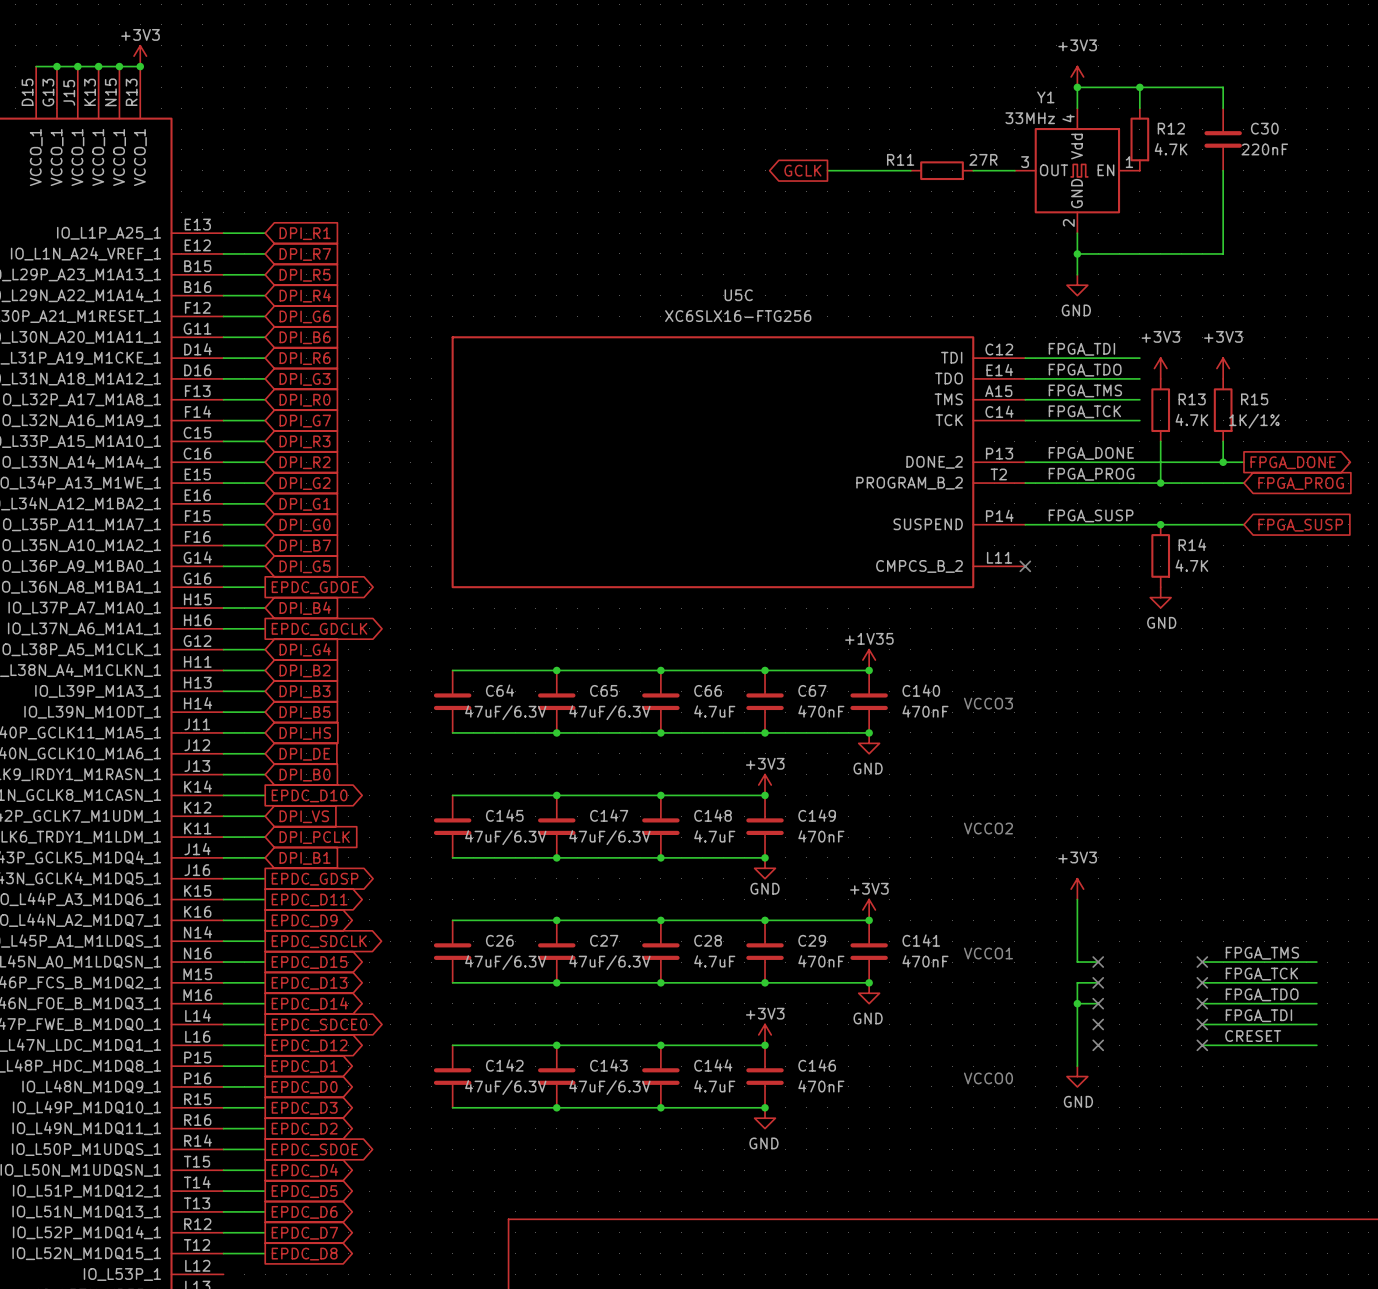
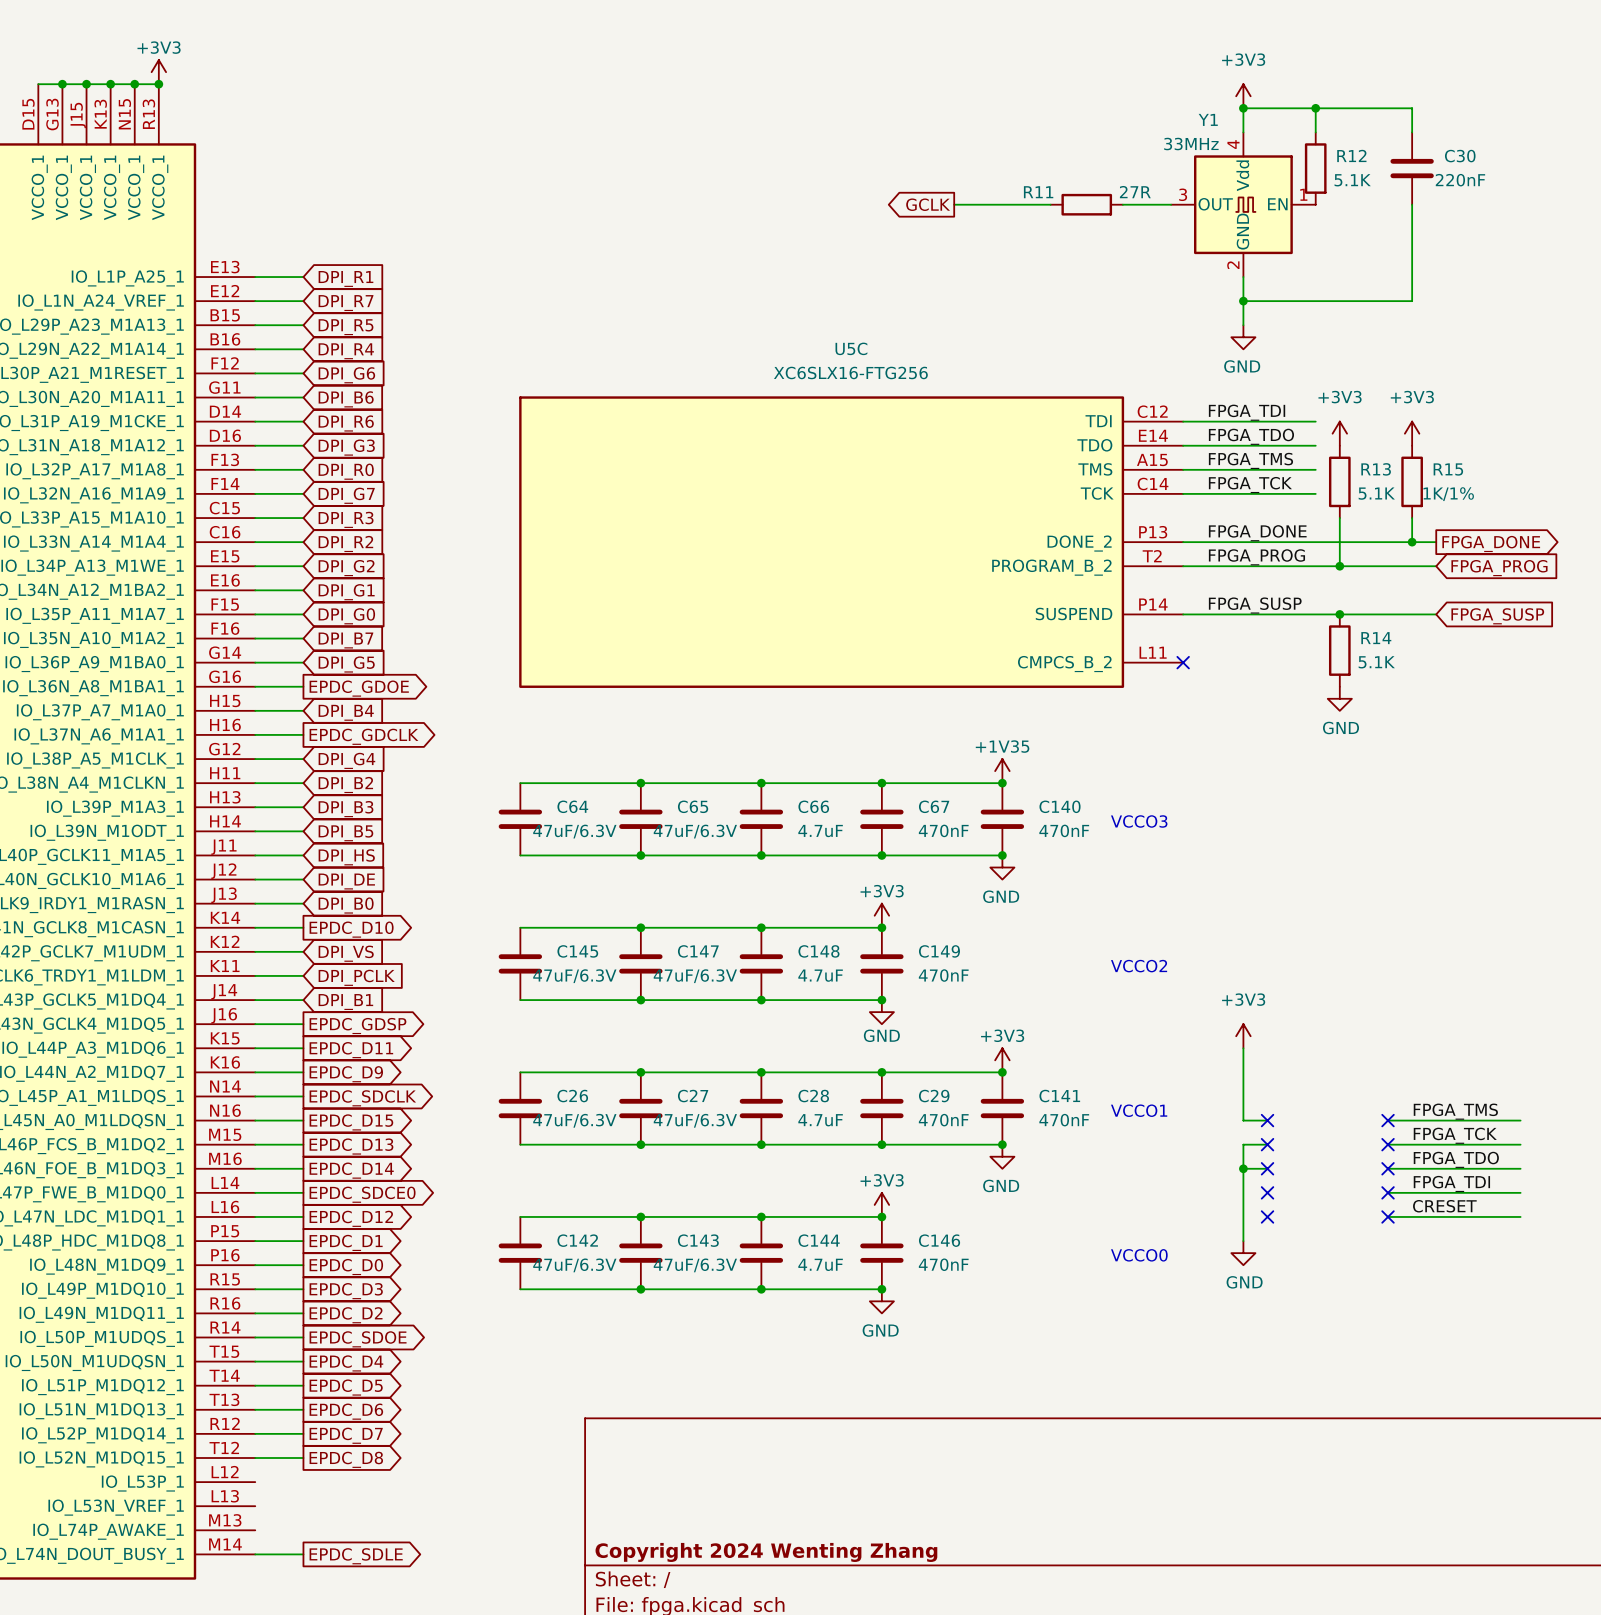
R12 value: 4.7K (1171, 149) -> 5.1K (1352, 180)
R13 value: 4.7K (1191, 419) -> 5.1K (1376, 493)
R14 value: 4.7K (1191, 565) -> 5.1K (1376, 662)

